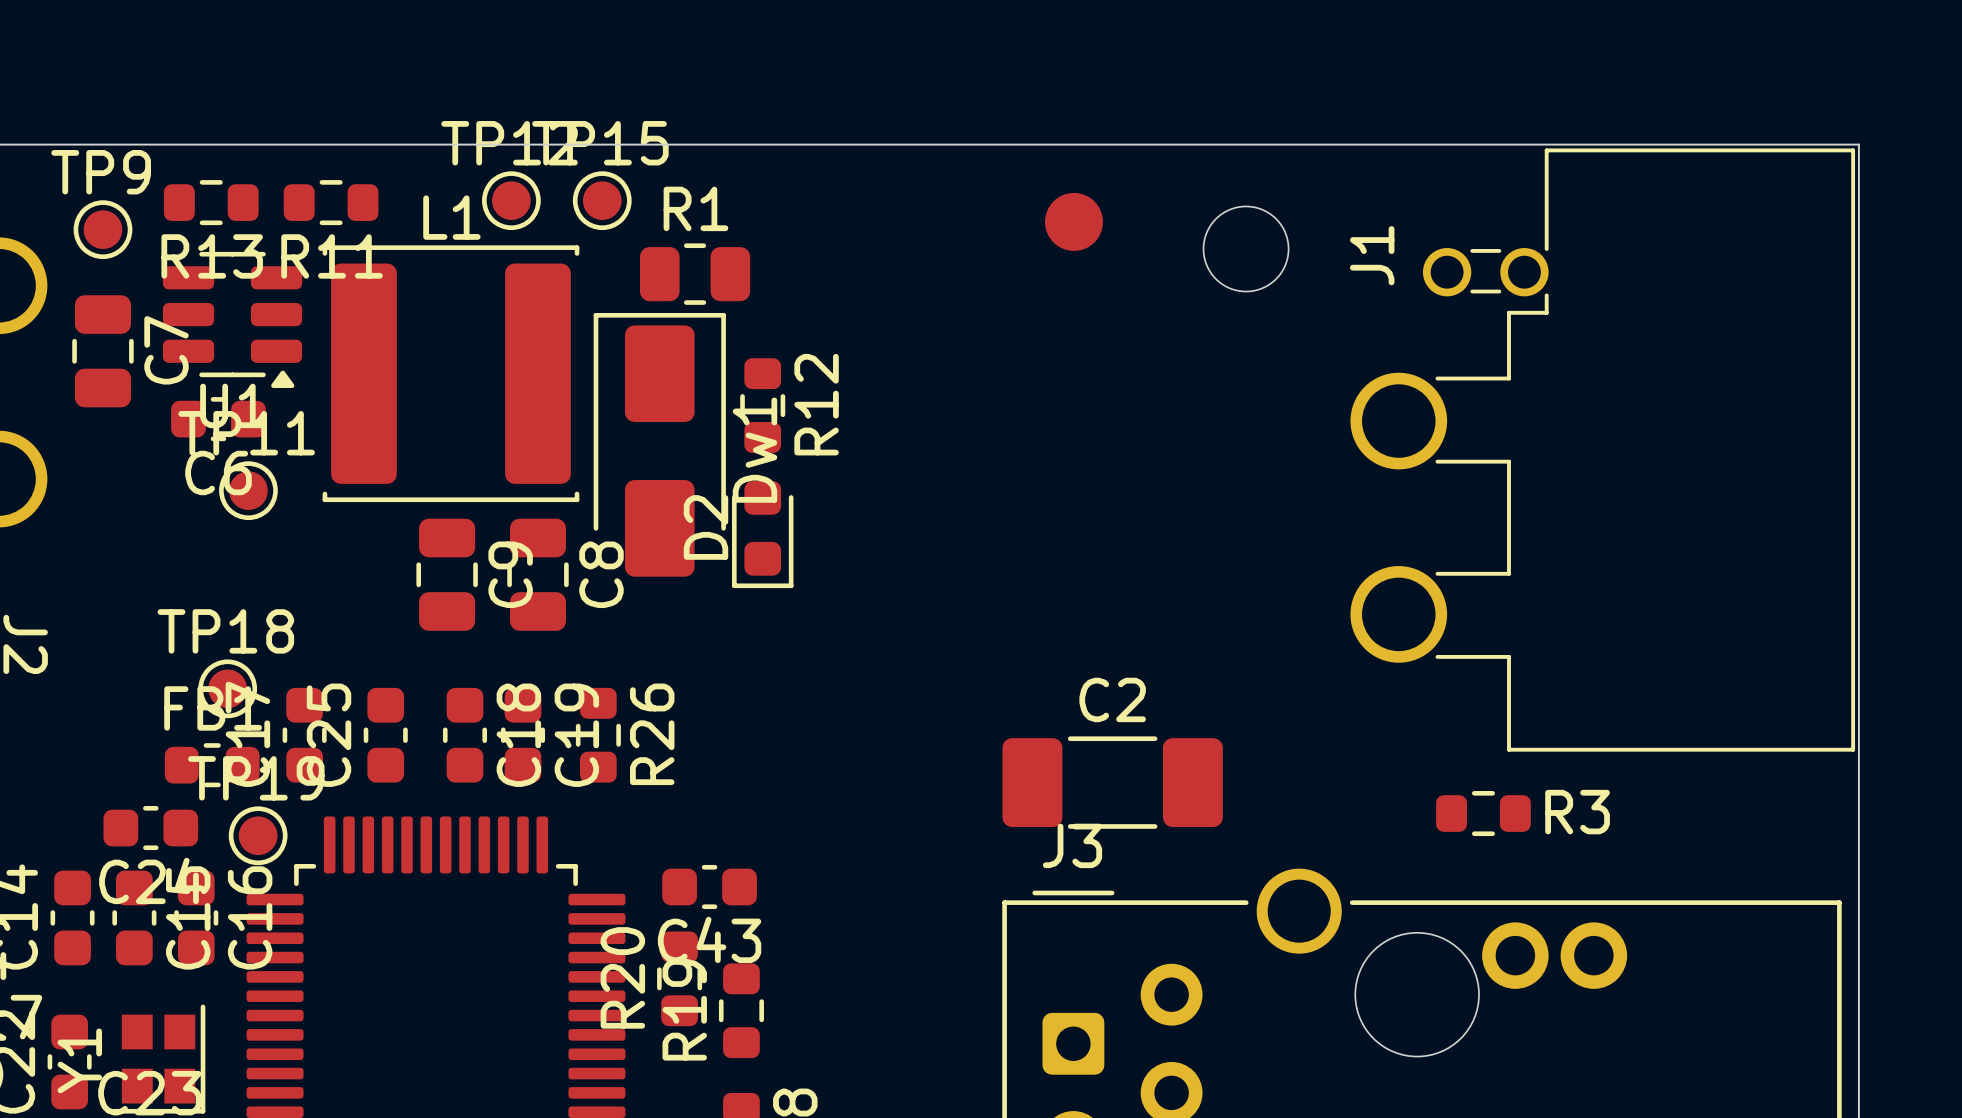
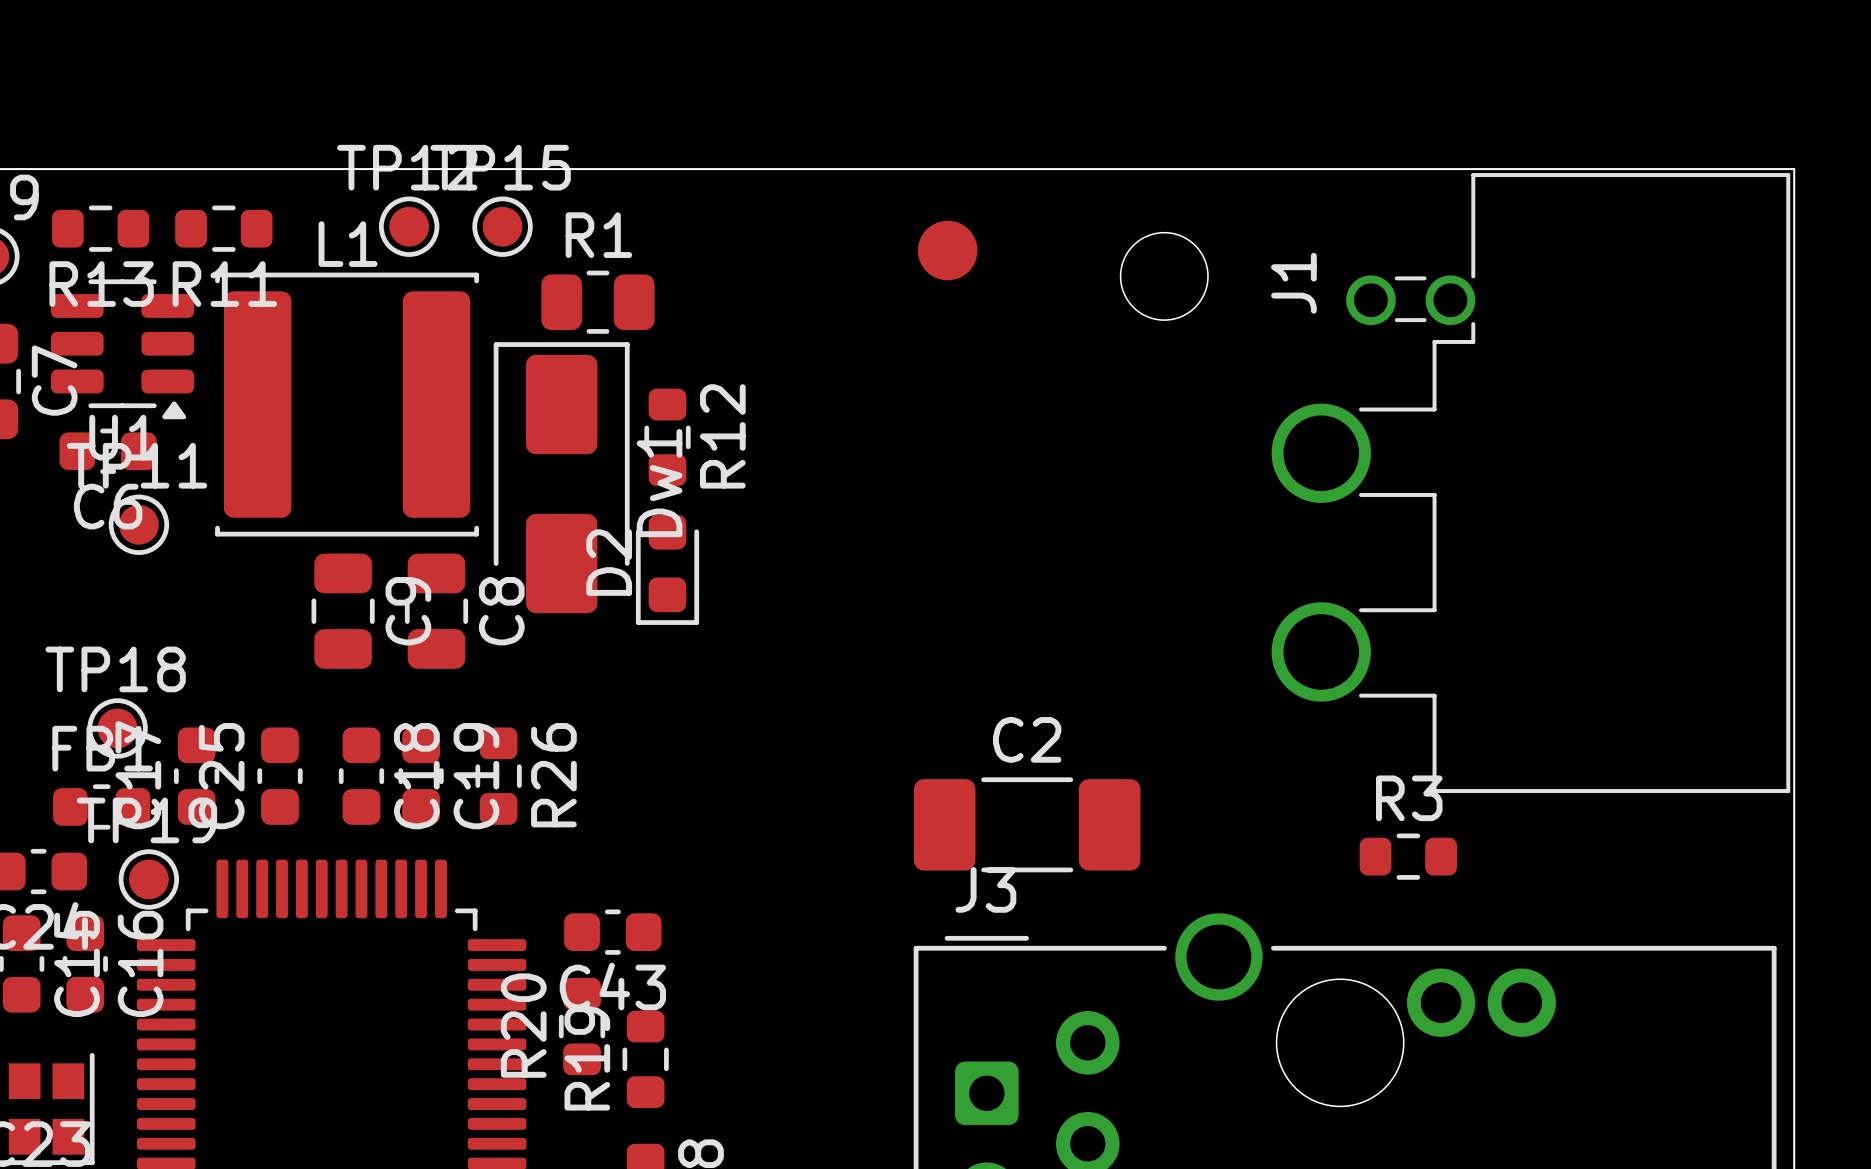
part position: (1073, 221) -> (947, 250)
R3 name position: R3 (1577, 812) -> R3 (1409, 798)

